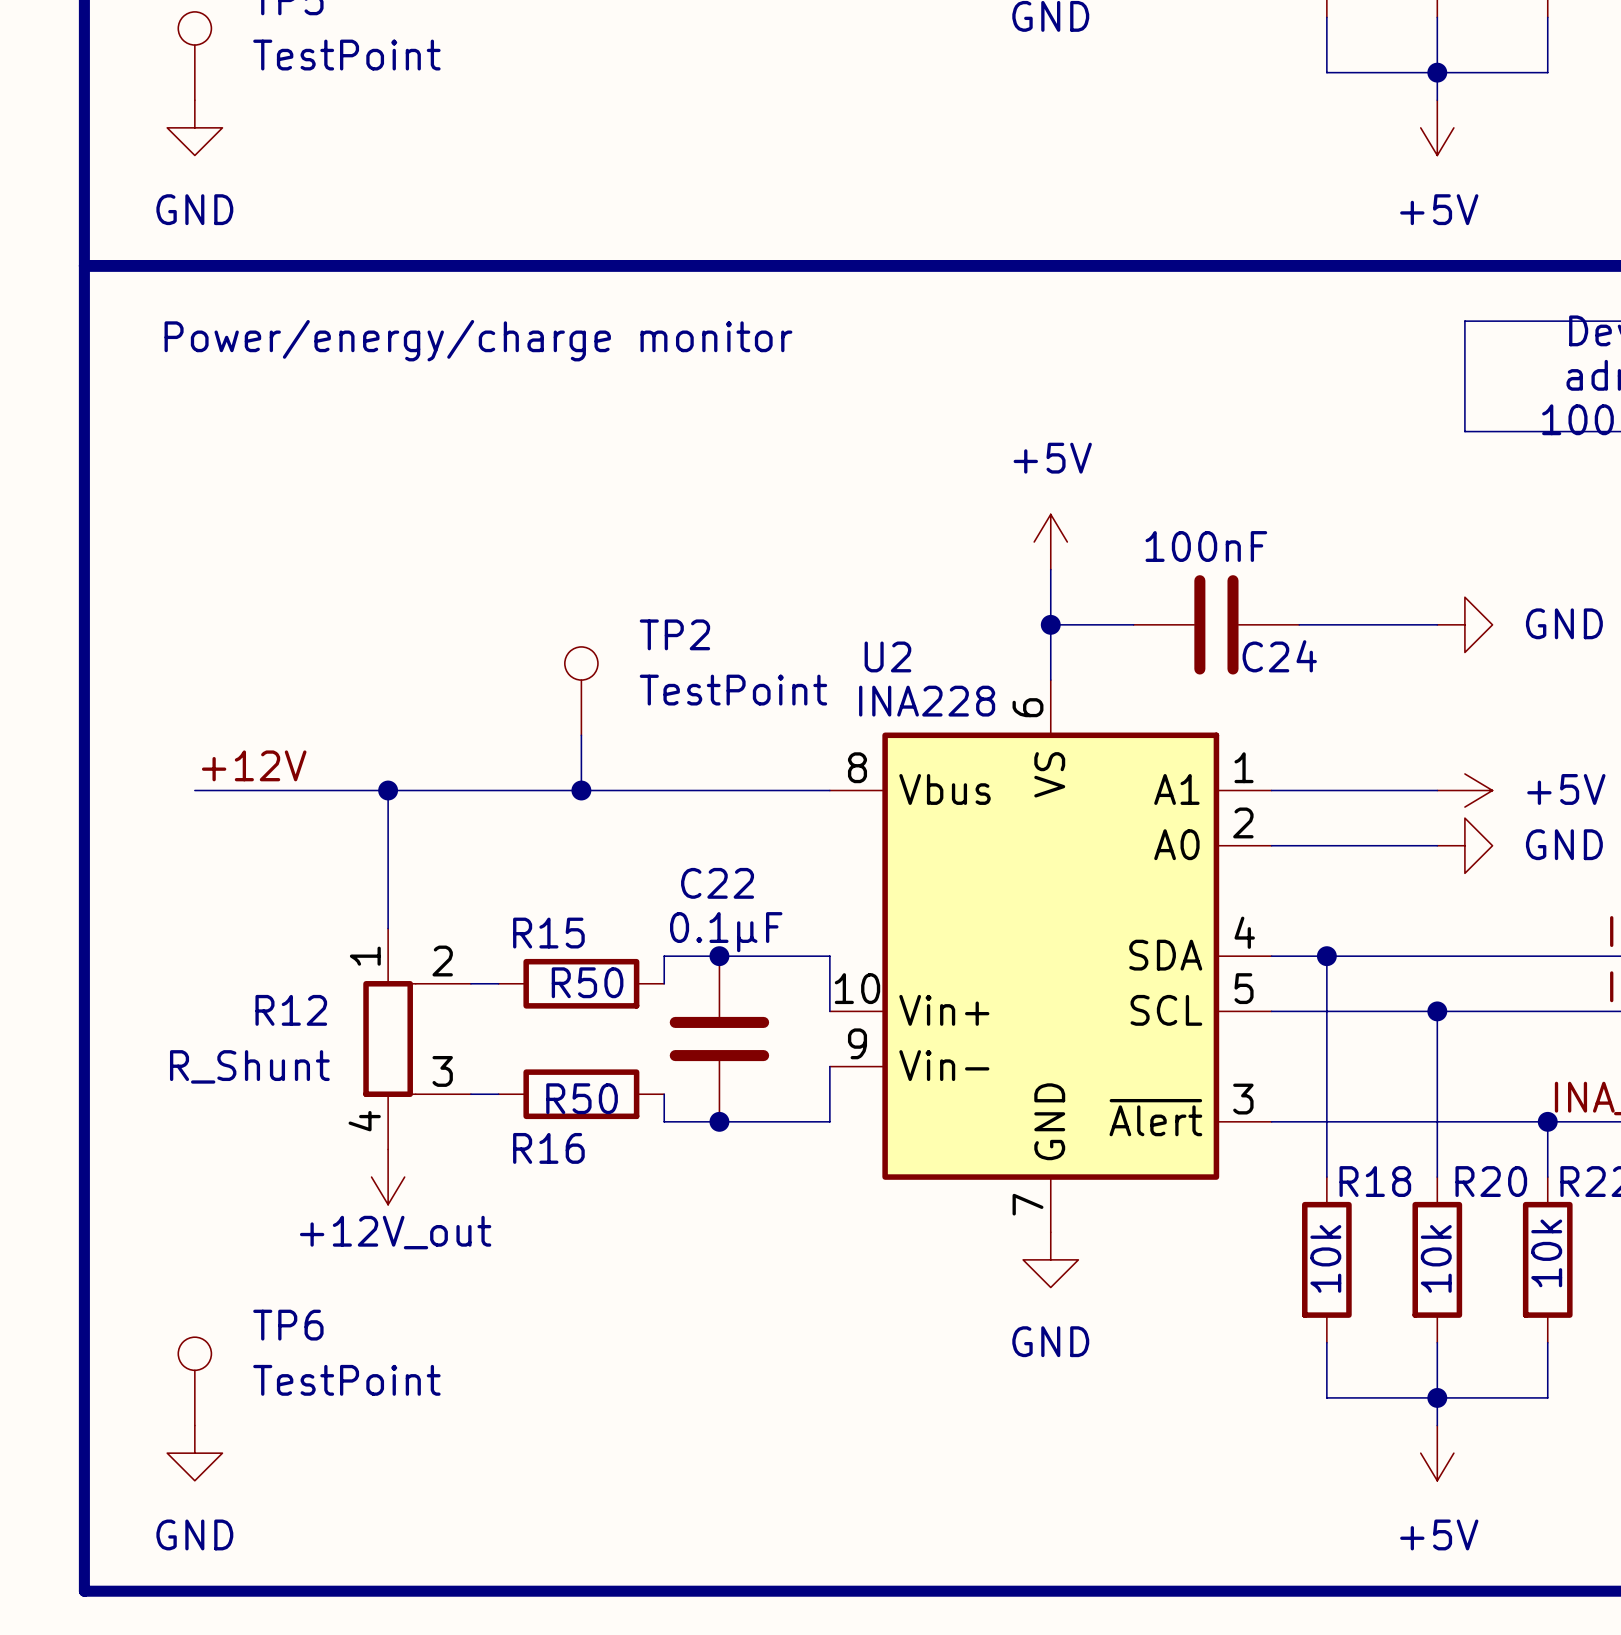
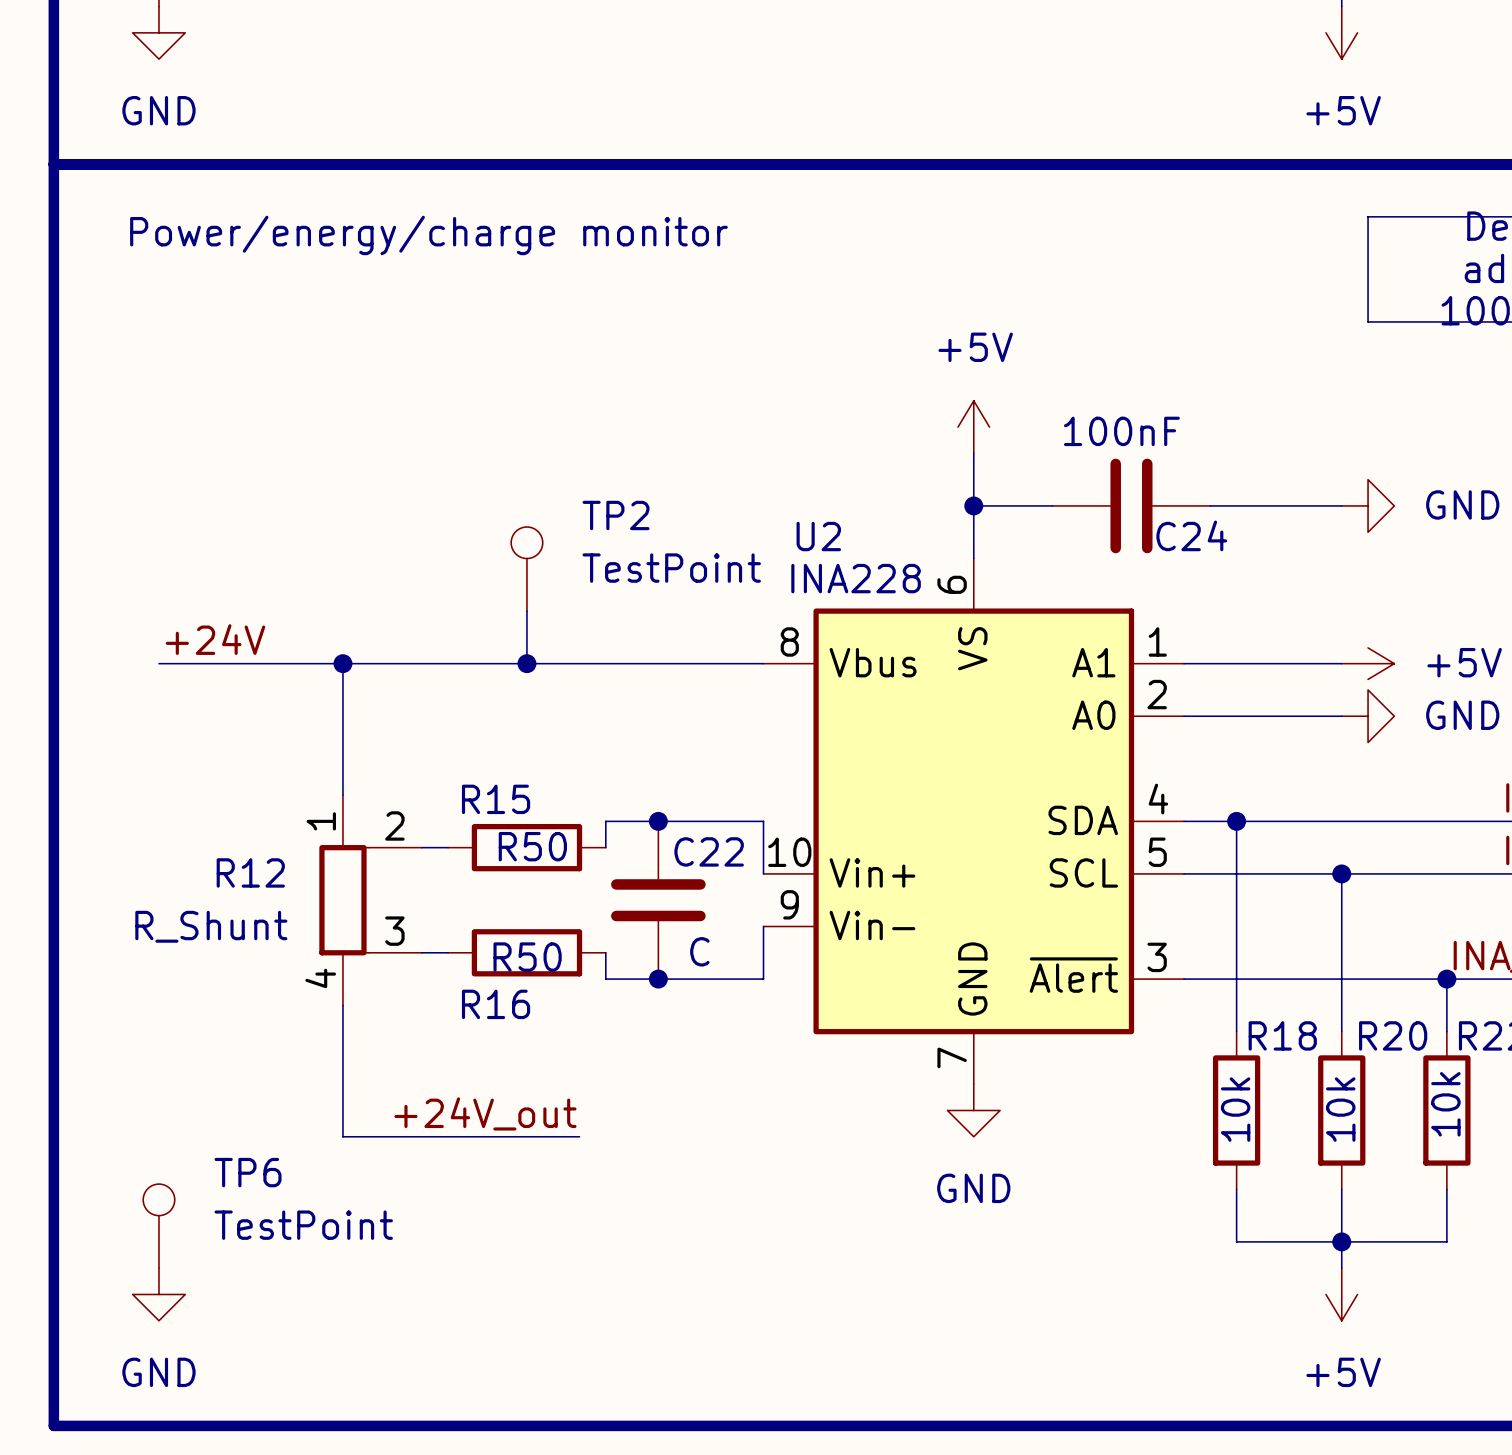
label: +12V (254, 765) -> +24V (215, 639)
C22 name position: C22 (717, 883) -> C22 (709, 851)
C22 value: 0.1µF (726, 932) -> C (699, 951)
wire: none -> (342, 1005) (342, 1136) (579, 1136)
power symbol: +12V_out (388, 1177) -> none
label: none -> +24V_out (485, 1113)

